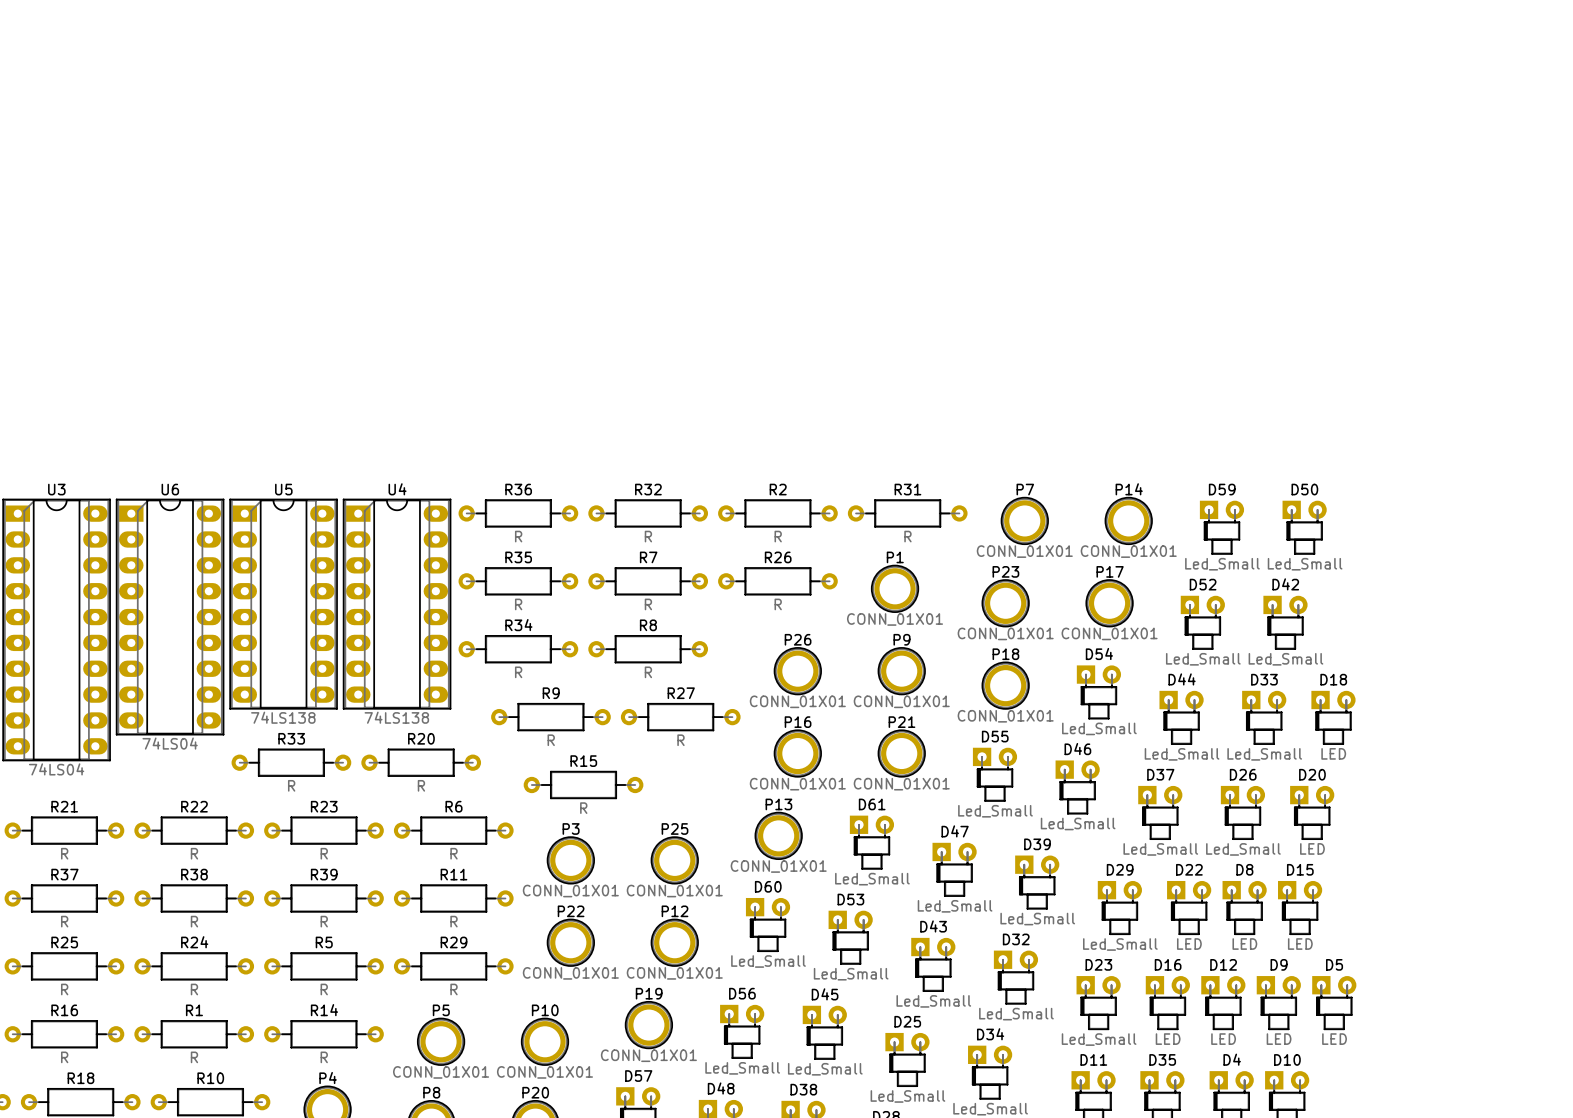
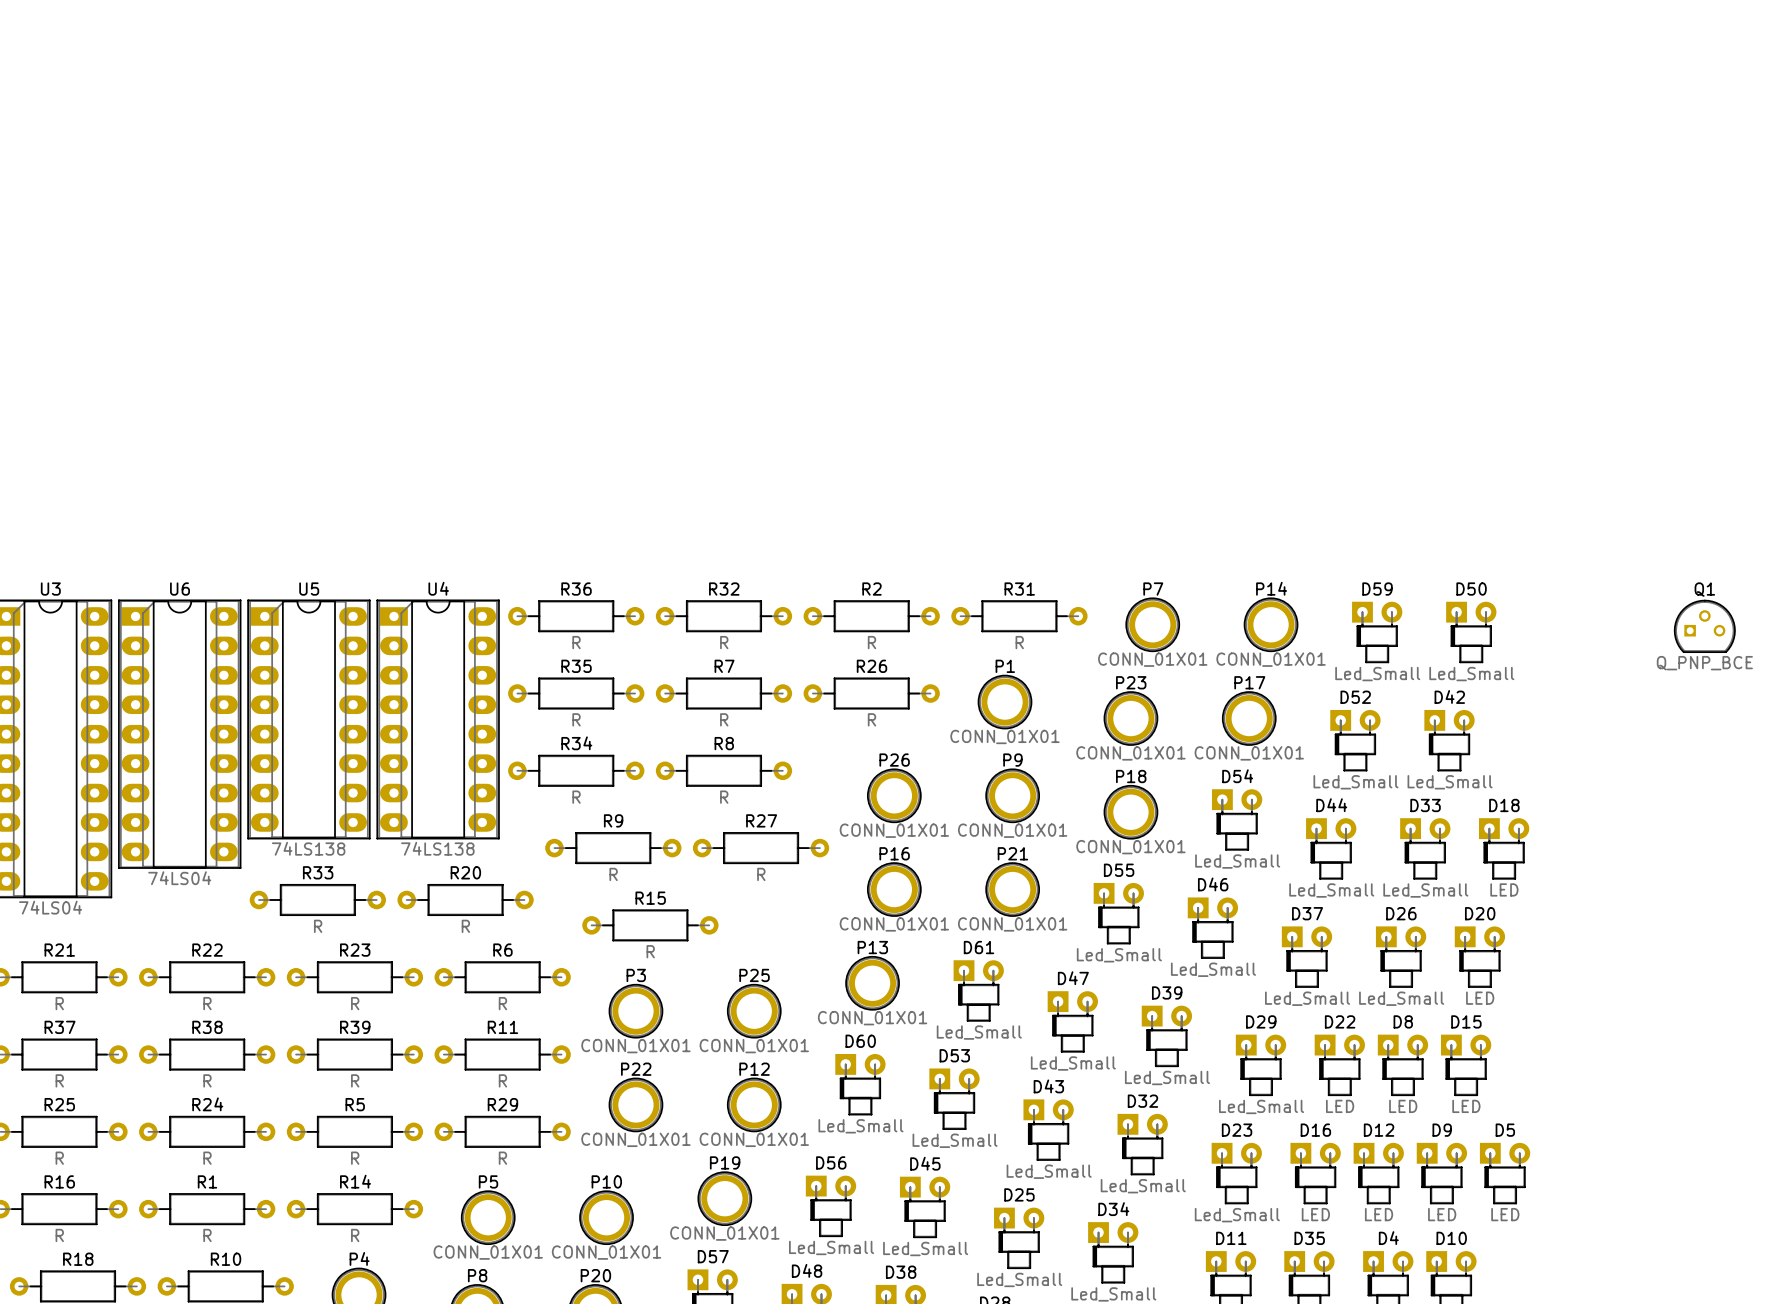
Q1: none -> Q_PNP_BCE (1704, 626)

